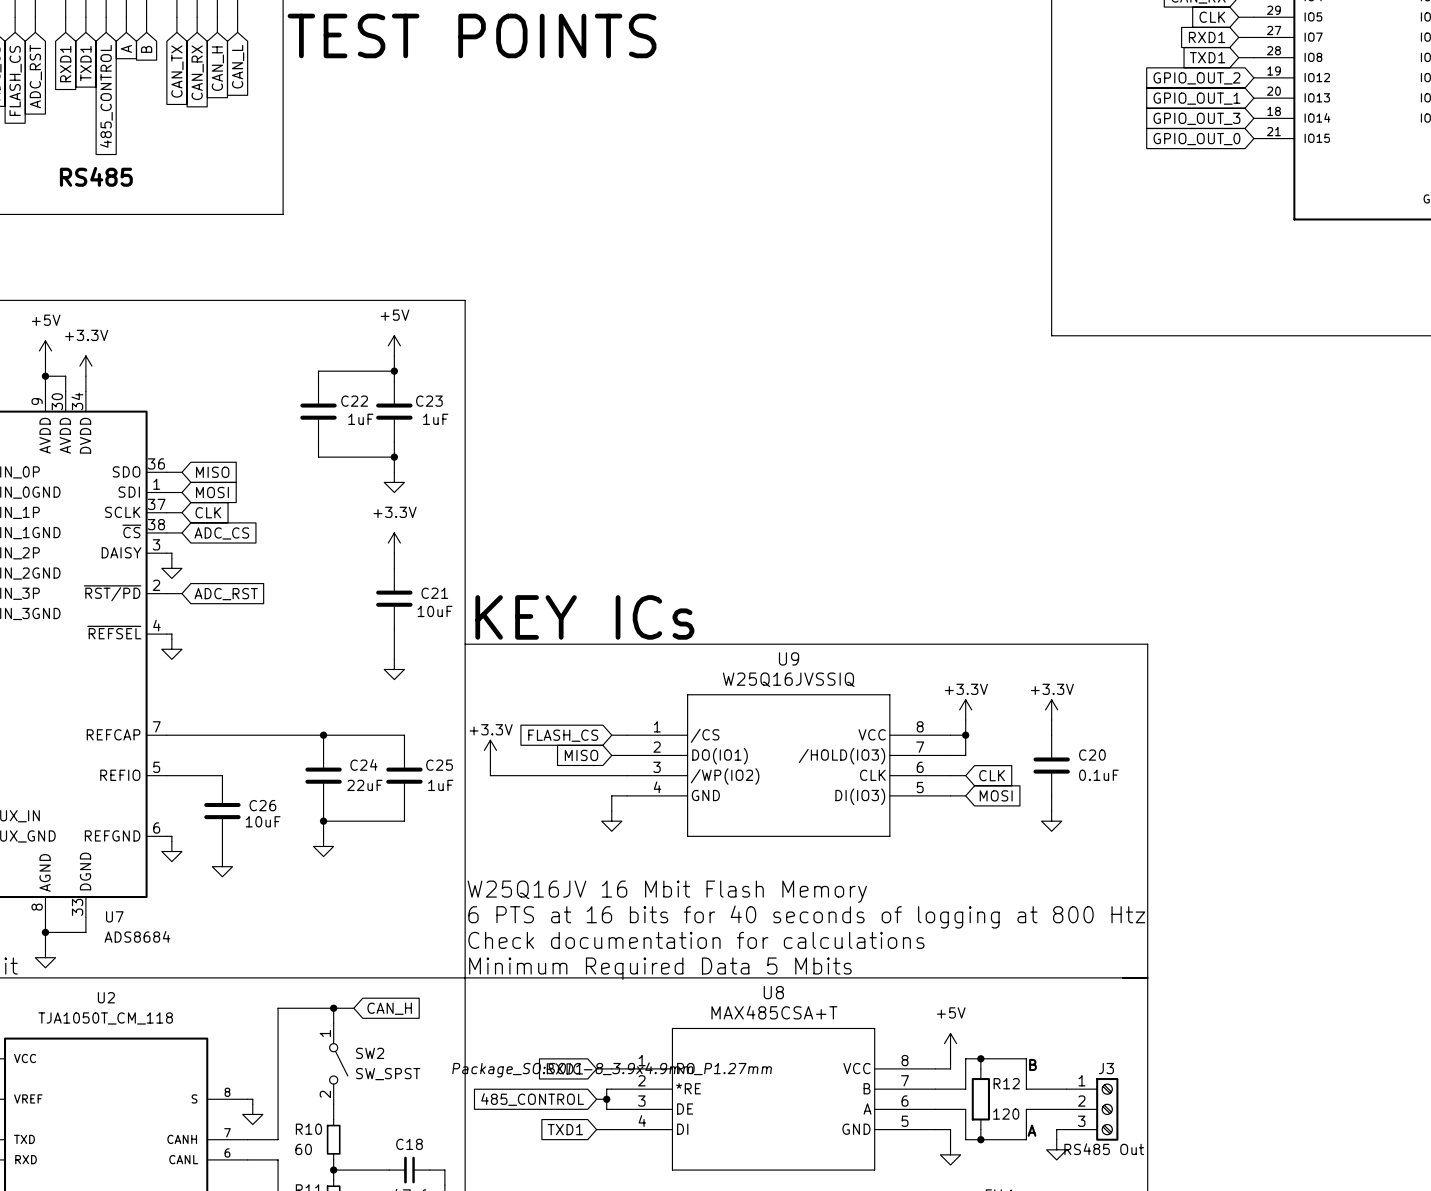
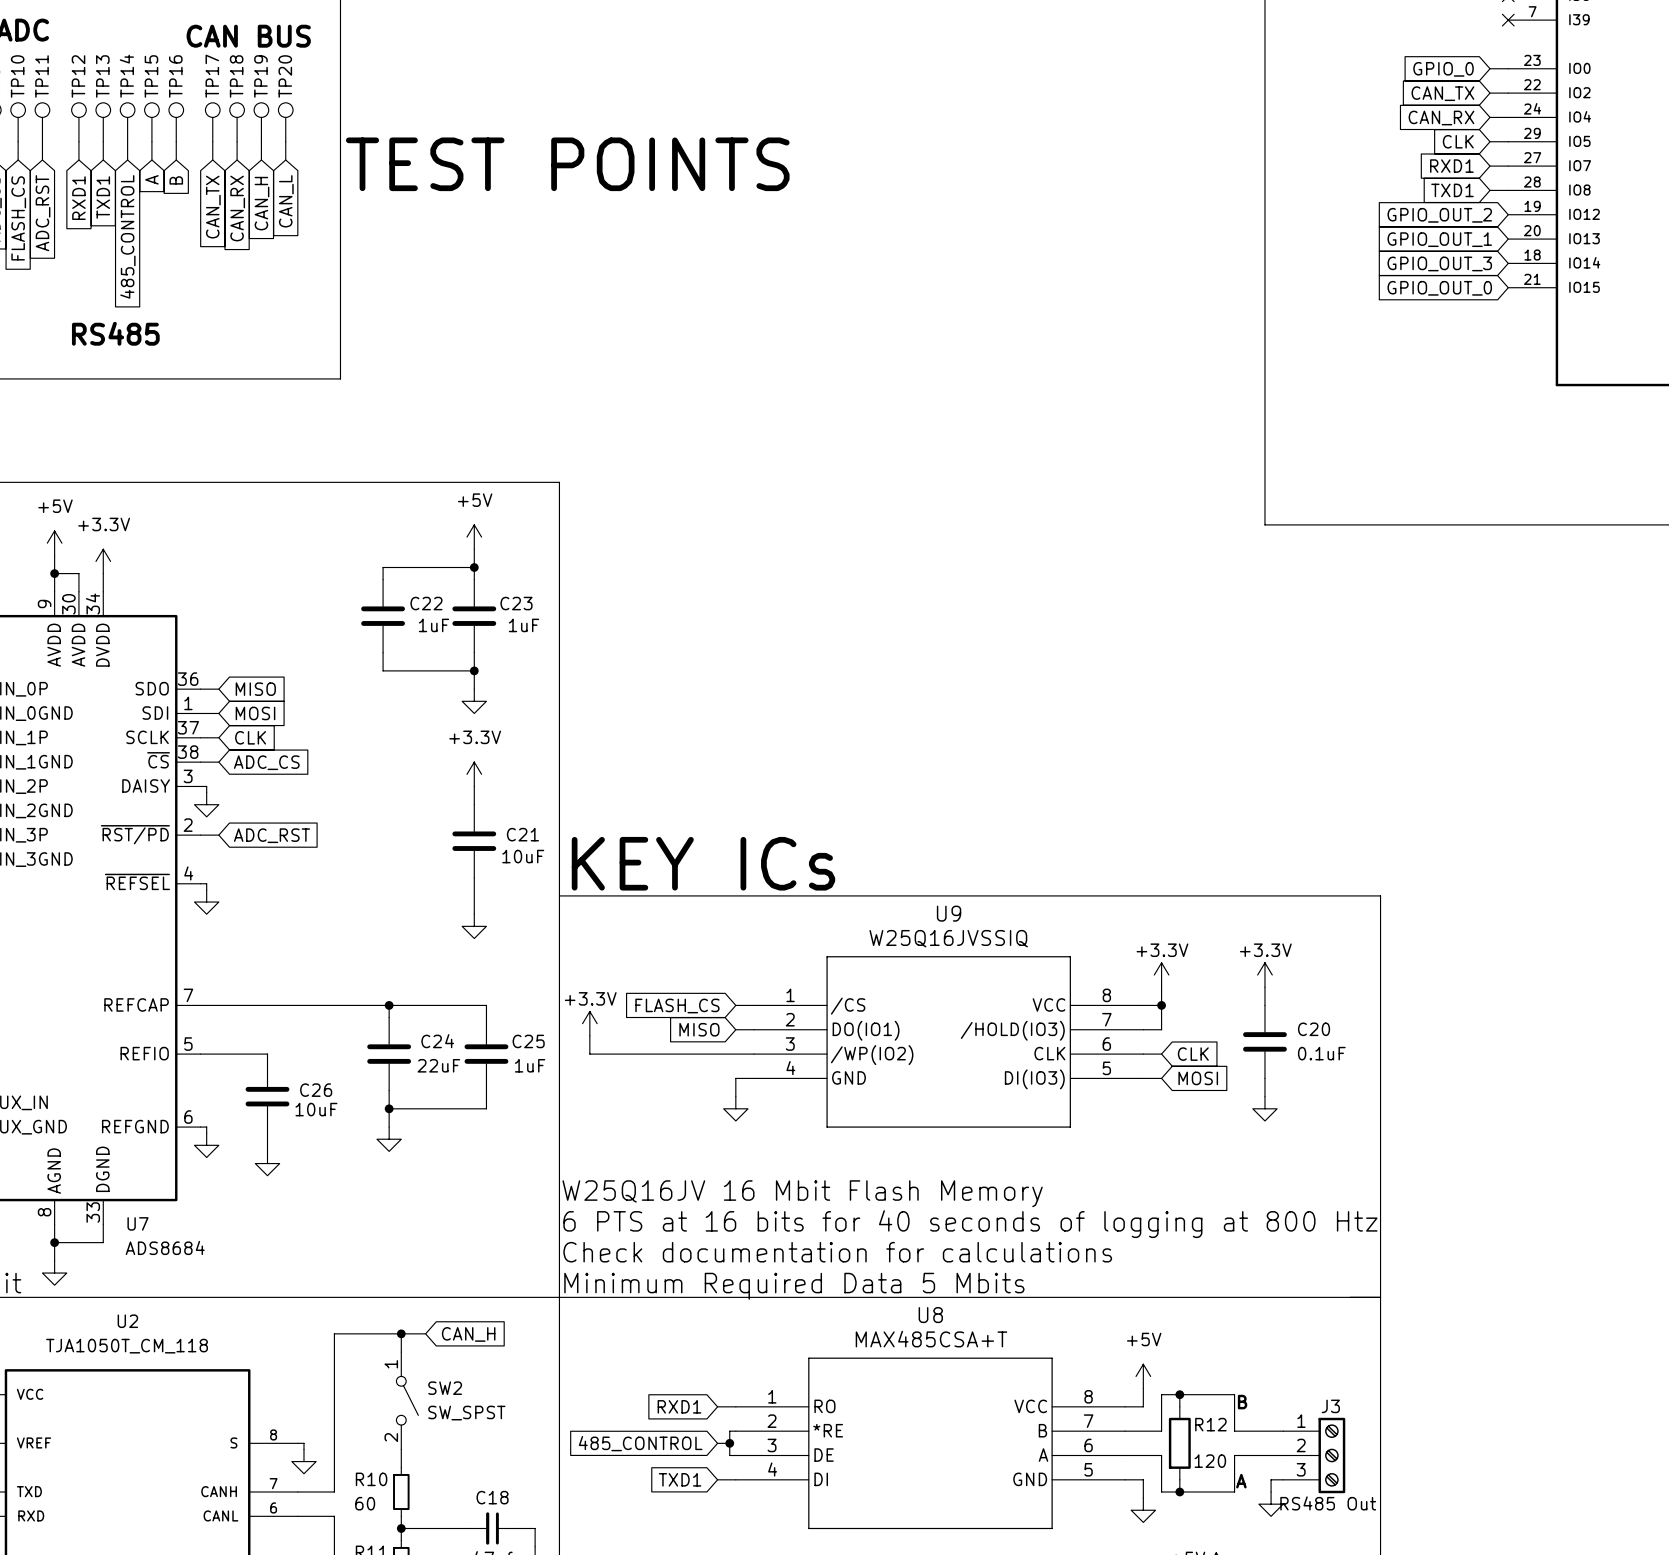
U8 text: Package_SO:SOIC-8_3.9x4.9mm_P1.27mm (612, 1069) -> none

